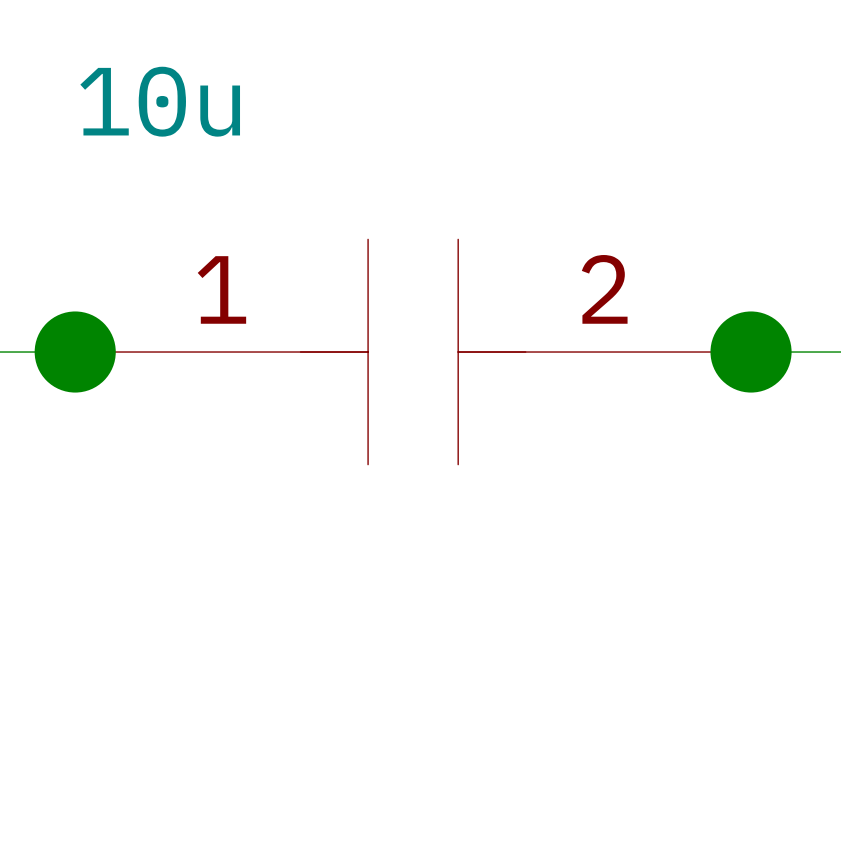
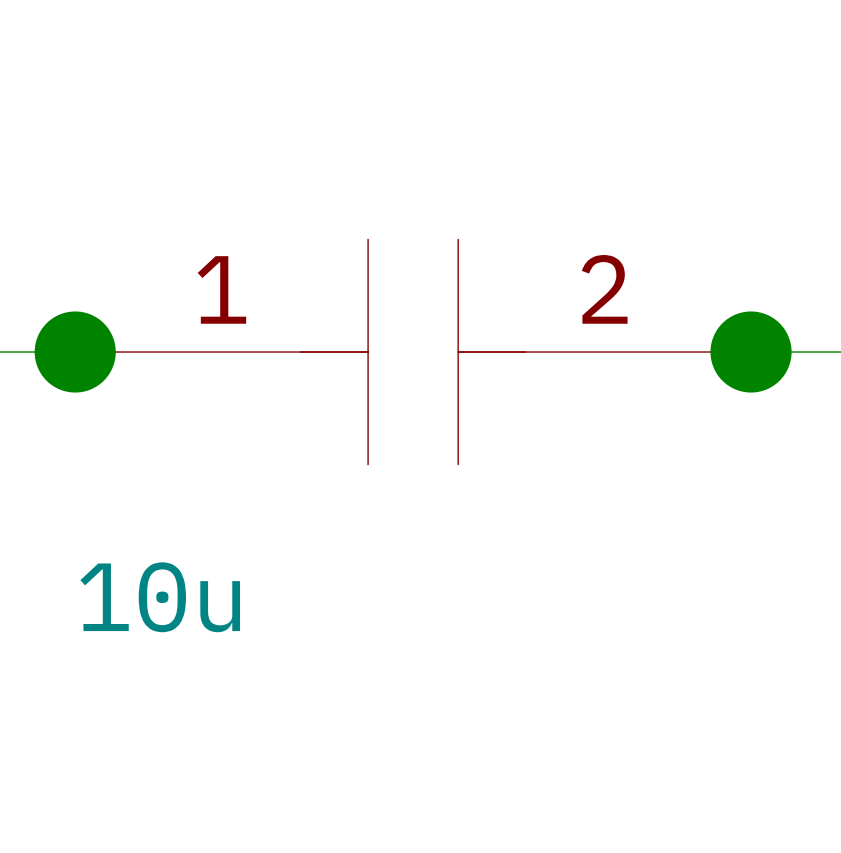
part value position: 10u (160, 101) -> 10u (160, 597)

